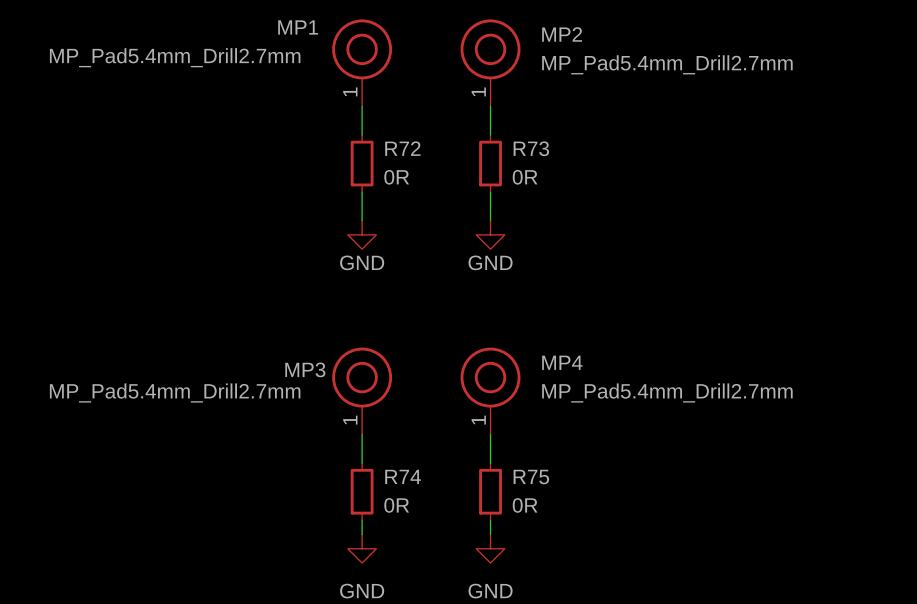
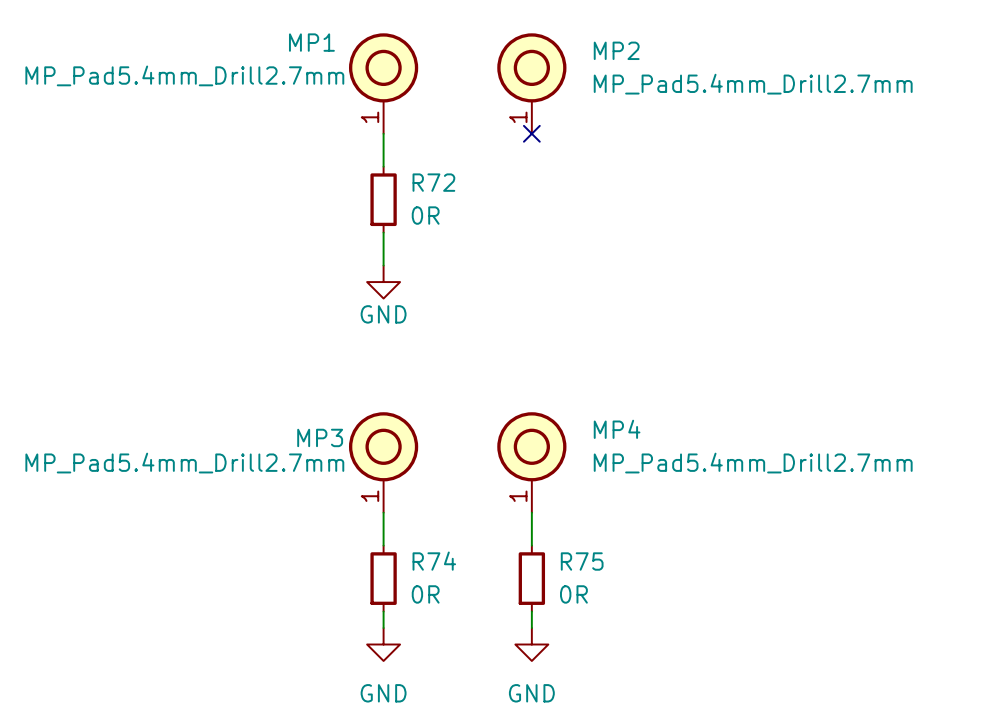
wire: (490, 106) (490, 135) -> none
no-connect mark: none -> (531, 133)
R73: (490, 163) -> none
wire: (490, 192) (490, 220) -> none
power symbol: GND (490, 234) -> none

